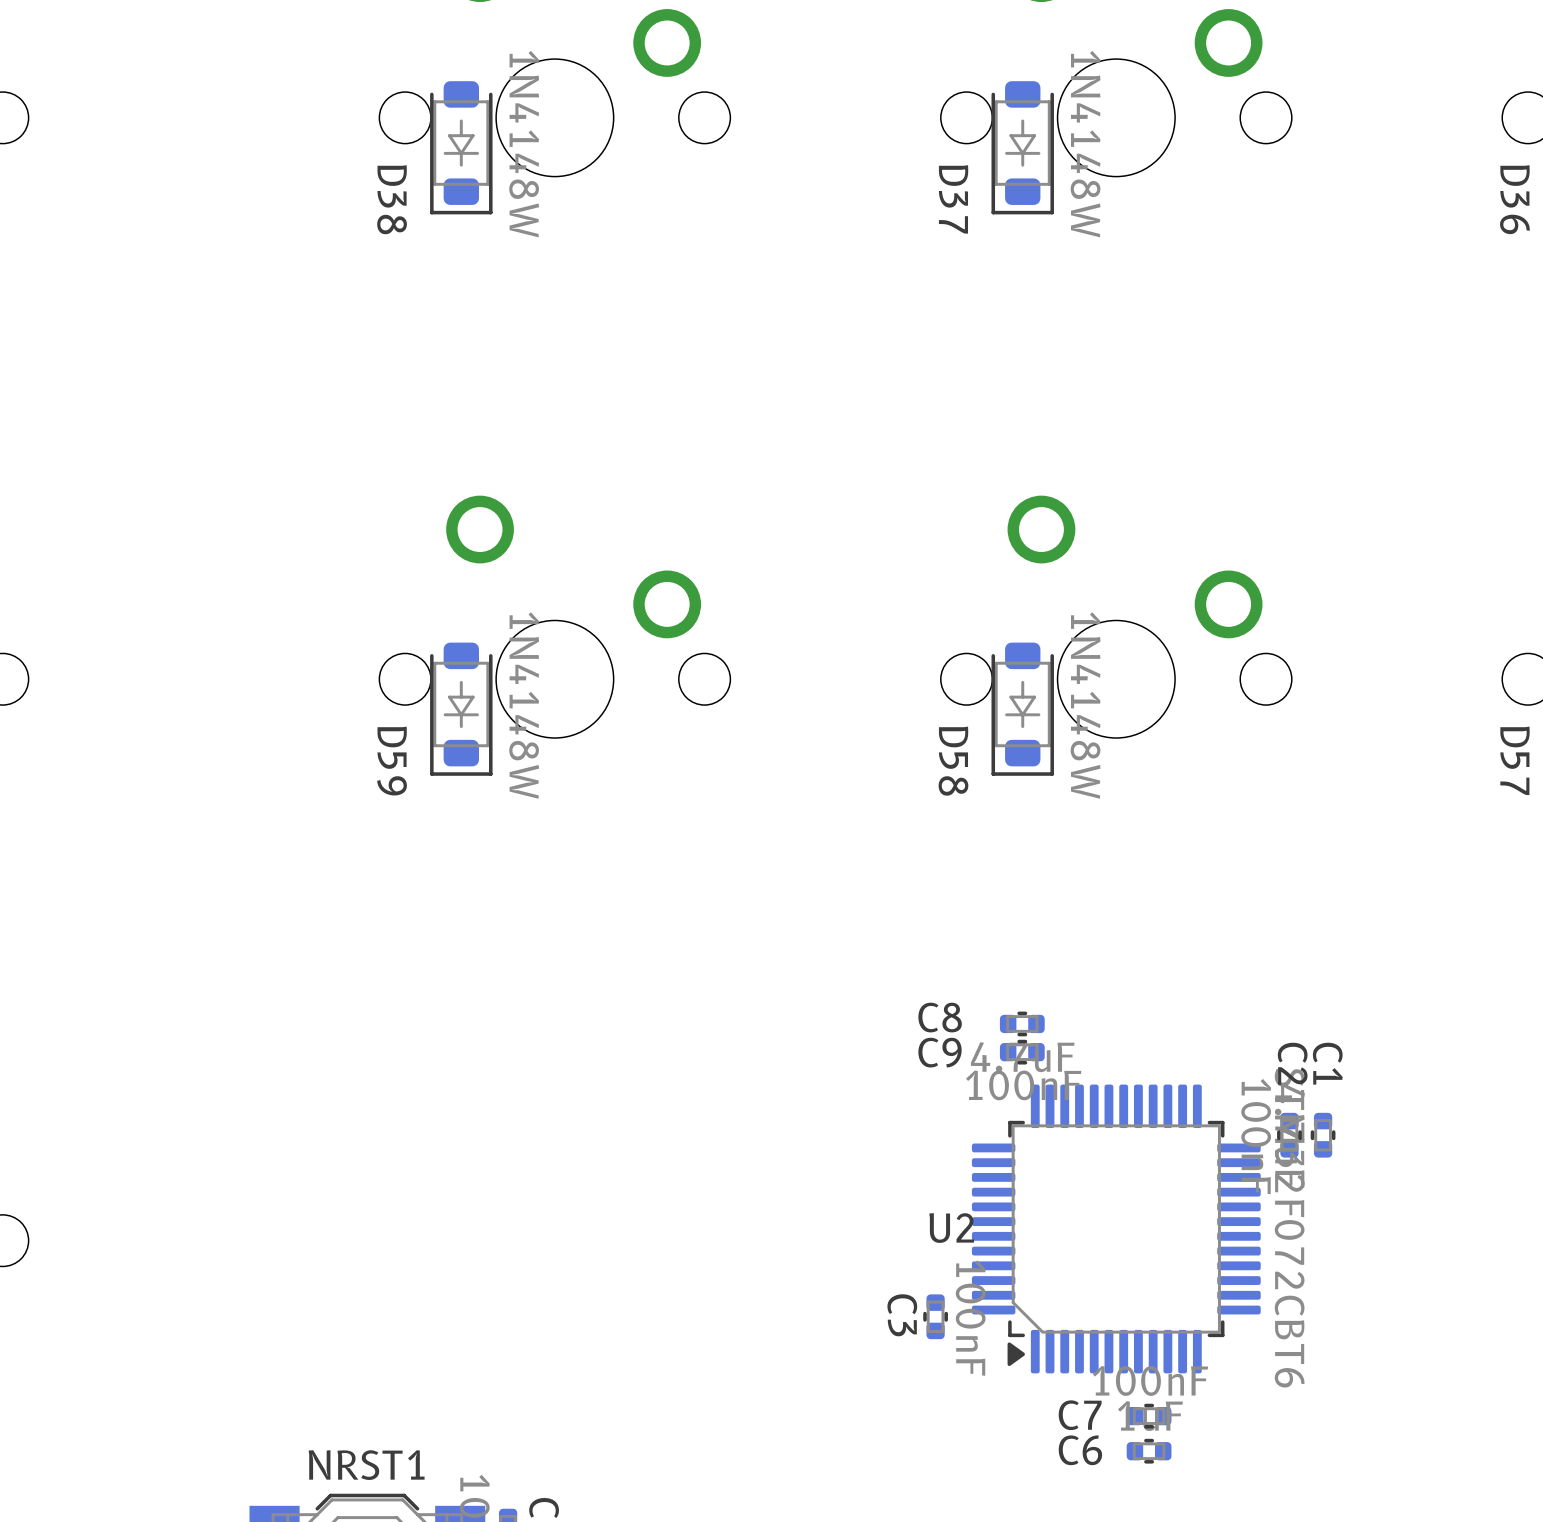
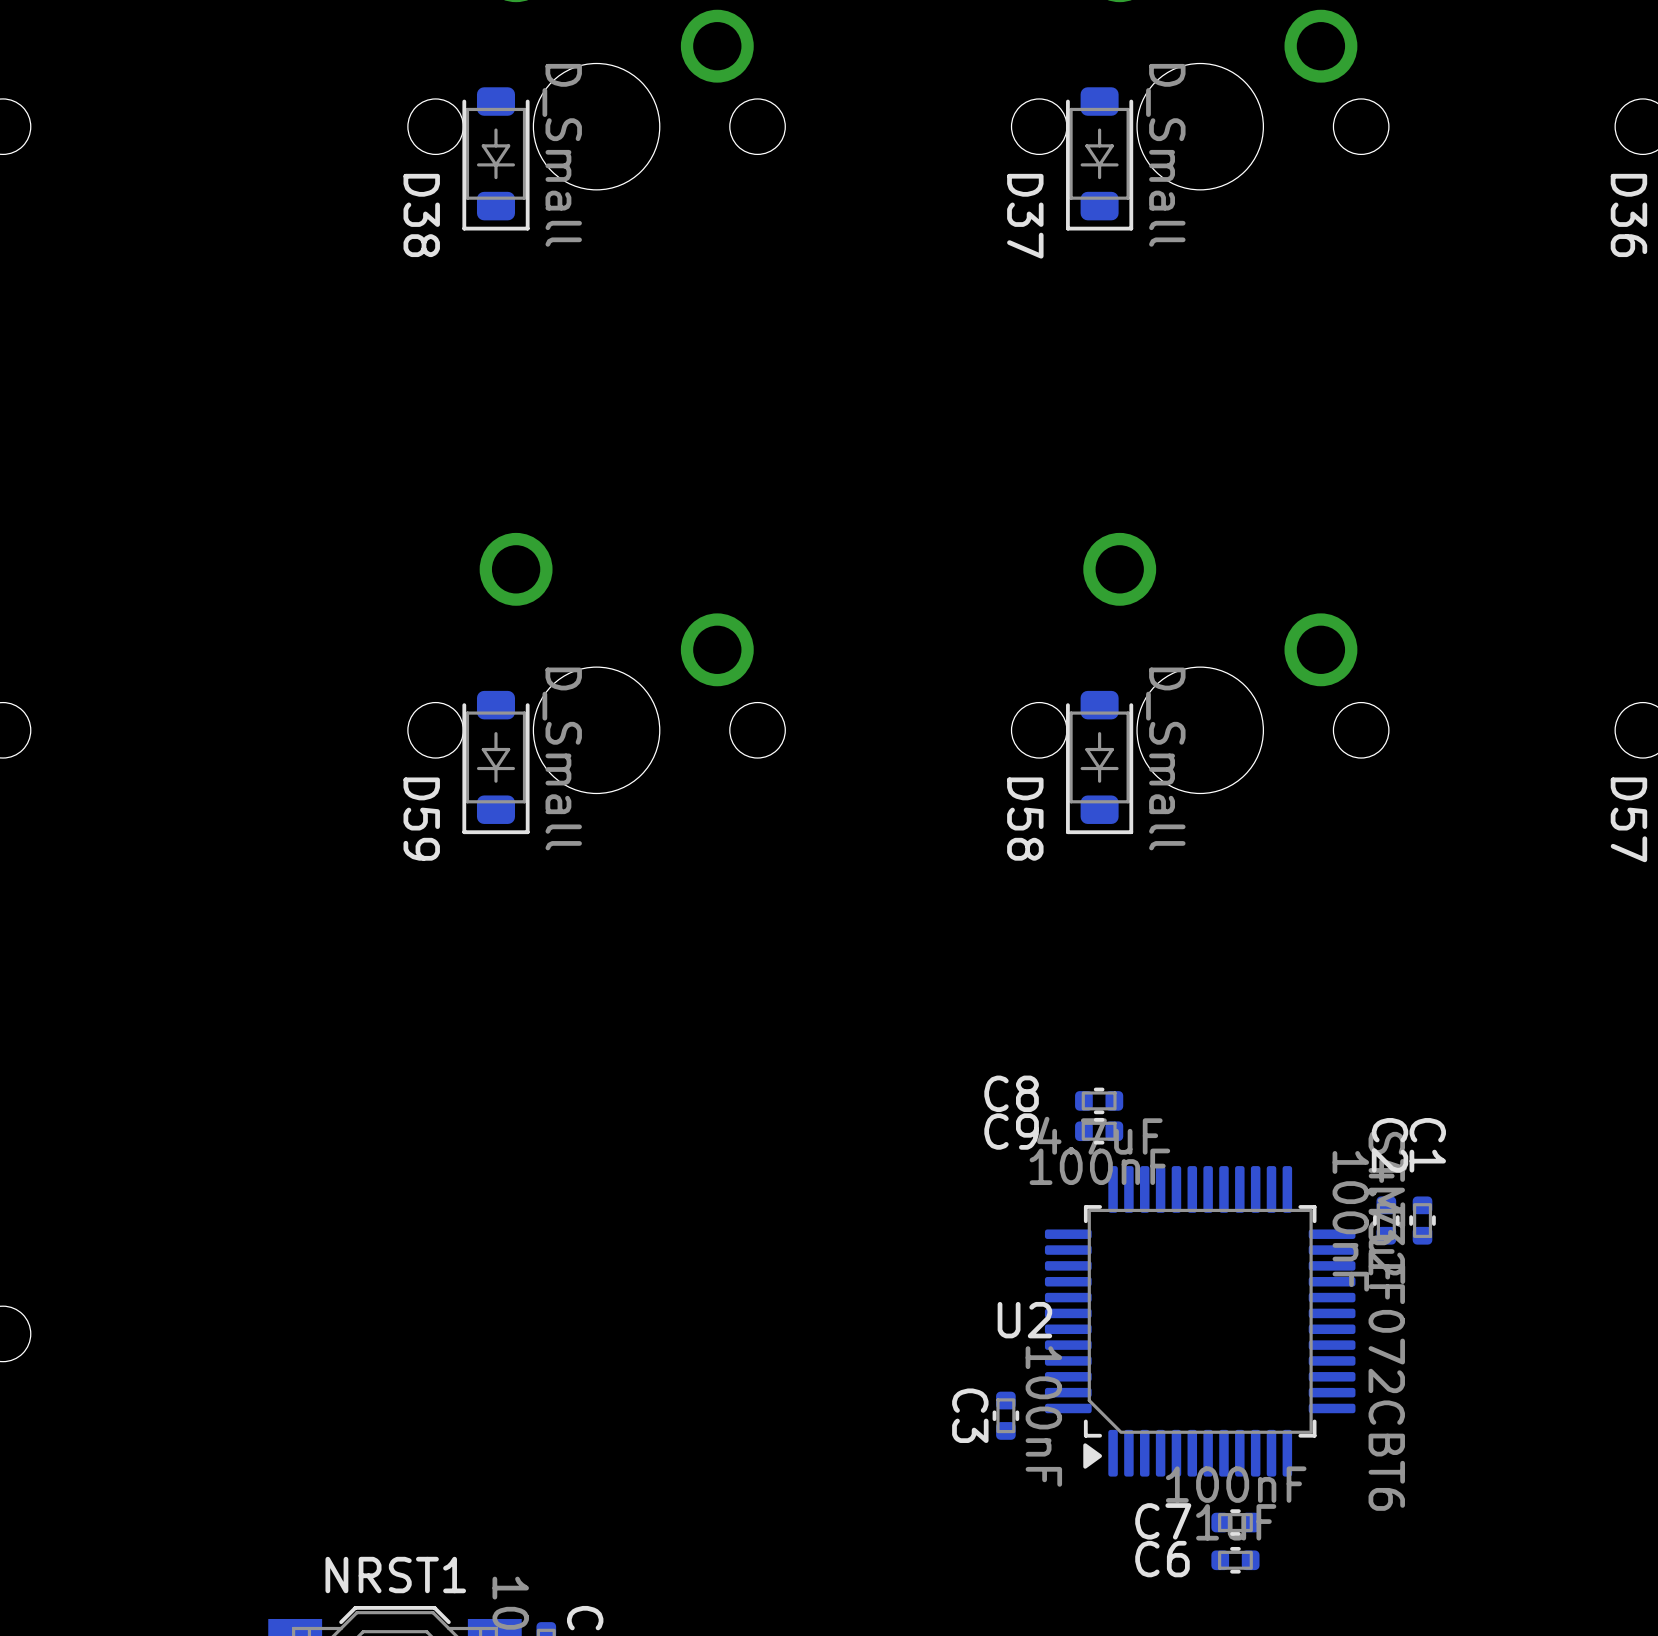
D38 value: 1N4148W (524, 144) -> D_Small (562, 155)
D37 value: 1N4148W (1085, 144) -> D_Small (1165, 155)
D59 value: 1N4148W (524, 705) -> D_Small (562, 758)
D58 value: 1N4148W (1085, 705) -> D_Small (1165, 758)

